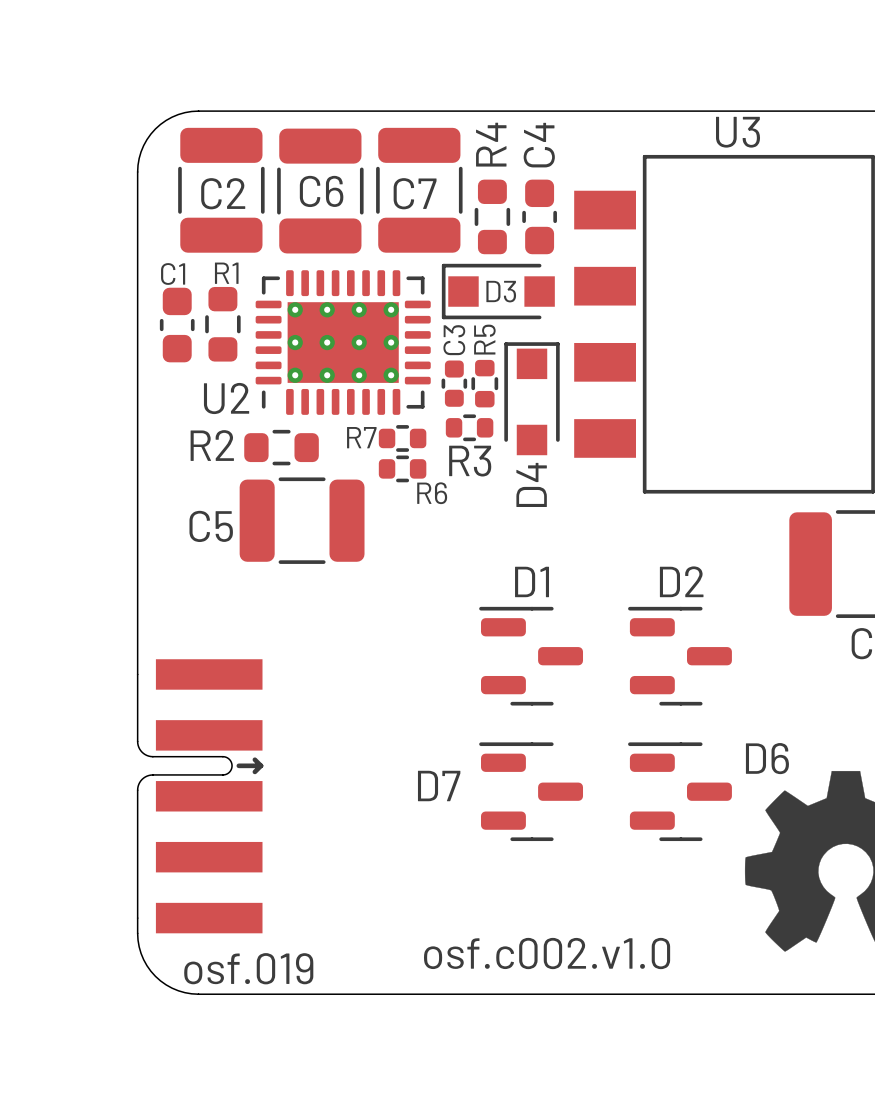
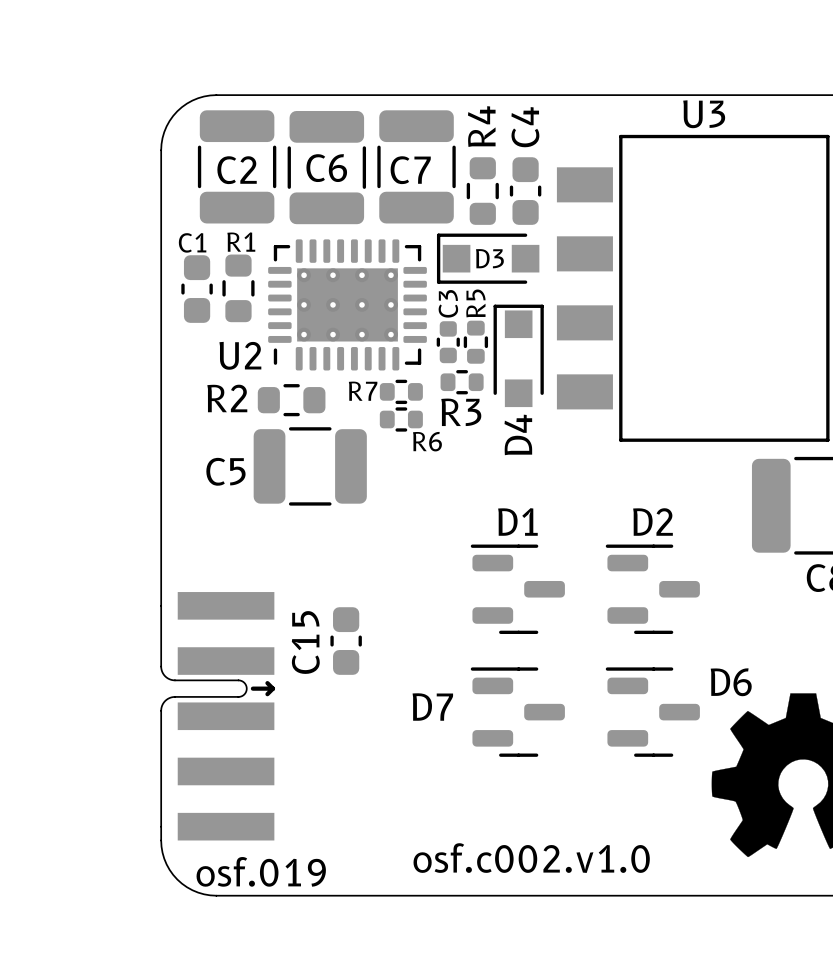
C15: none -> (346, 641)

